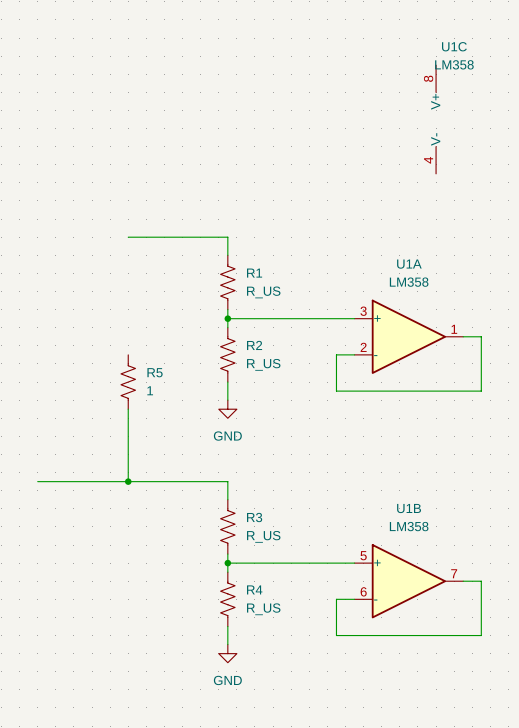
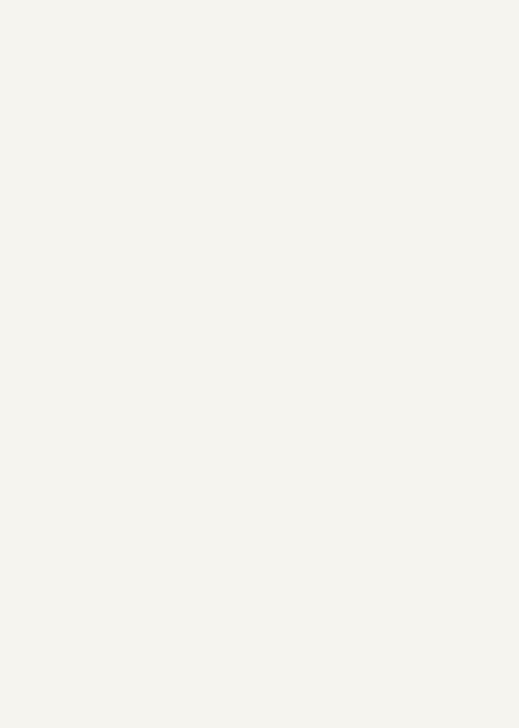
U1C: LM358 (436, 119) -> none
wire: (128, 237) (227, 237) (227, 255) -> none
R1: R_US (227, 282) -> none
wire: (227, 309) (227, 327) -> none
wire: (227, 318) (354, 318) -> none
junction: (227, 318) -> none
U1A: LM358 (408, 336) -> none
wire: (463, 336) (481, 336) (481, 391) (336, 391) (336, 354) (354, 354) -> none
R2: R_US (227, 354) -> none
R5: 1 (128, 382) -> none
wire: (227, 382) (227, 400) -> none
wire: (128, 409) (128, 481) -> none
power symbol: GND (227, 409) -> none
wire: (37, 481) (227, 481) (227, 499) -> none
junction: (128, 481) -> none
R3: R_US (227, 526) -> none
wire: (227, 554) (227, 572) -> none
wire: (227, 563) (354, 563) -> none
junction: (227, 563) -> none
U1B: LM358 (408, 581) -> none
wire: (463, 581) (481, 581) (481, 635) (336, 635) (336, 599) (354, 599) -> none
R4: R_US (227, 599) -> none
wire: (227, 626) (227, 644) -> none
power symbol: GND (227, 653) -> none

